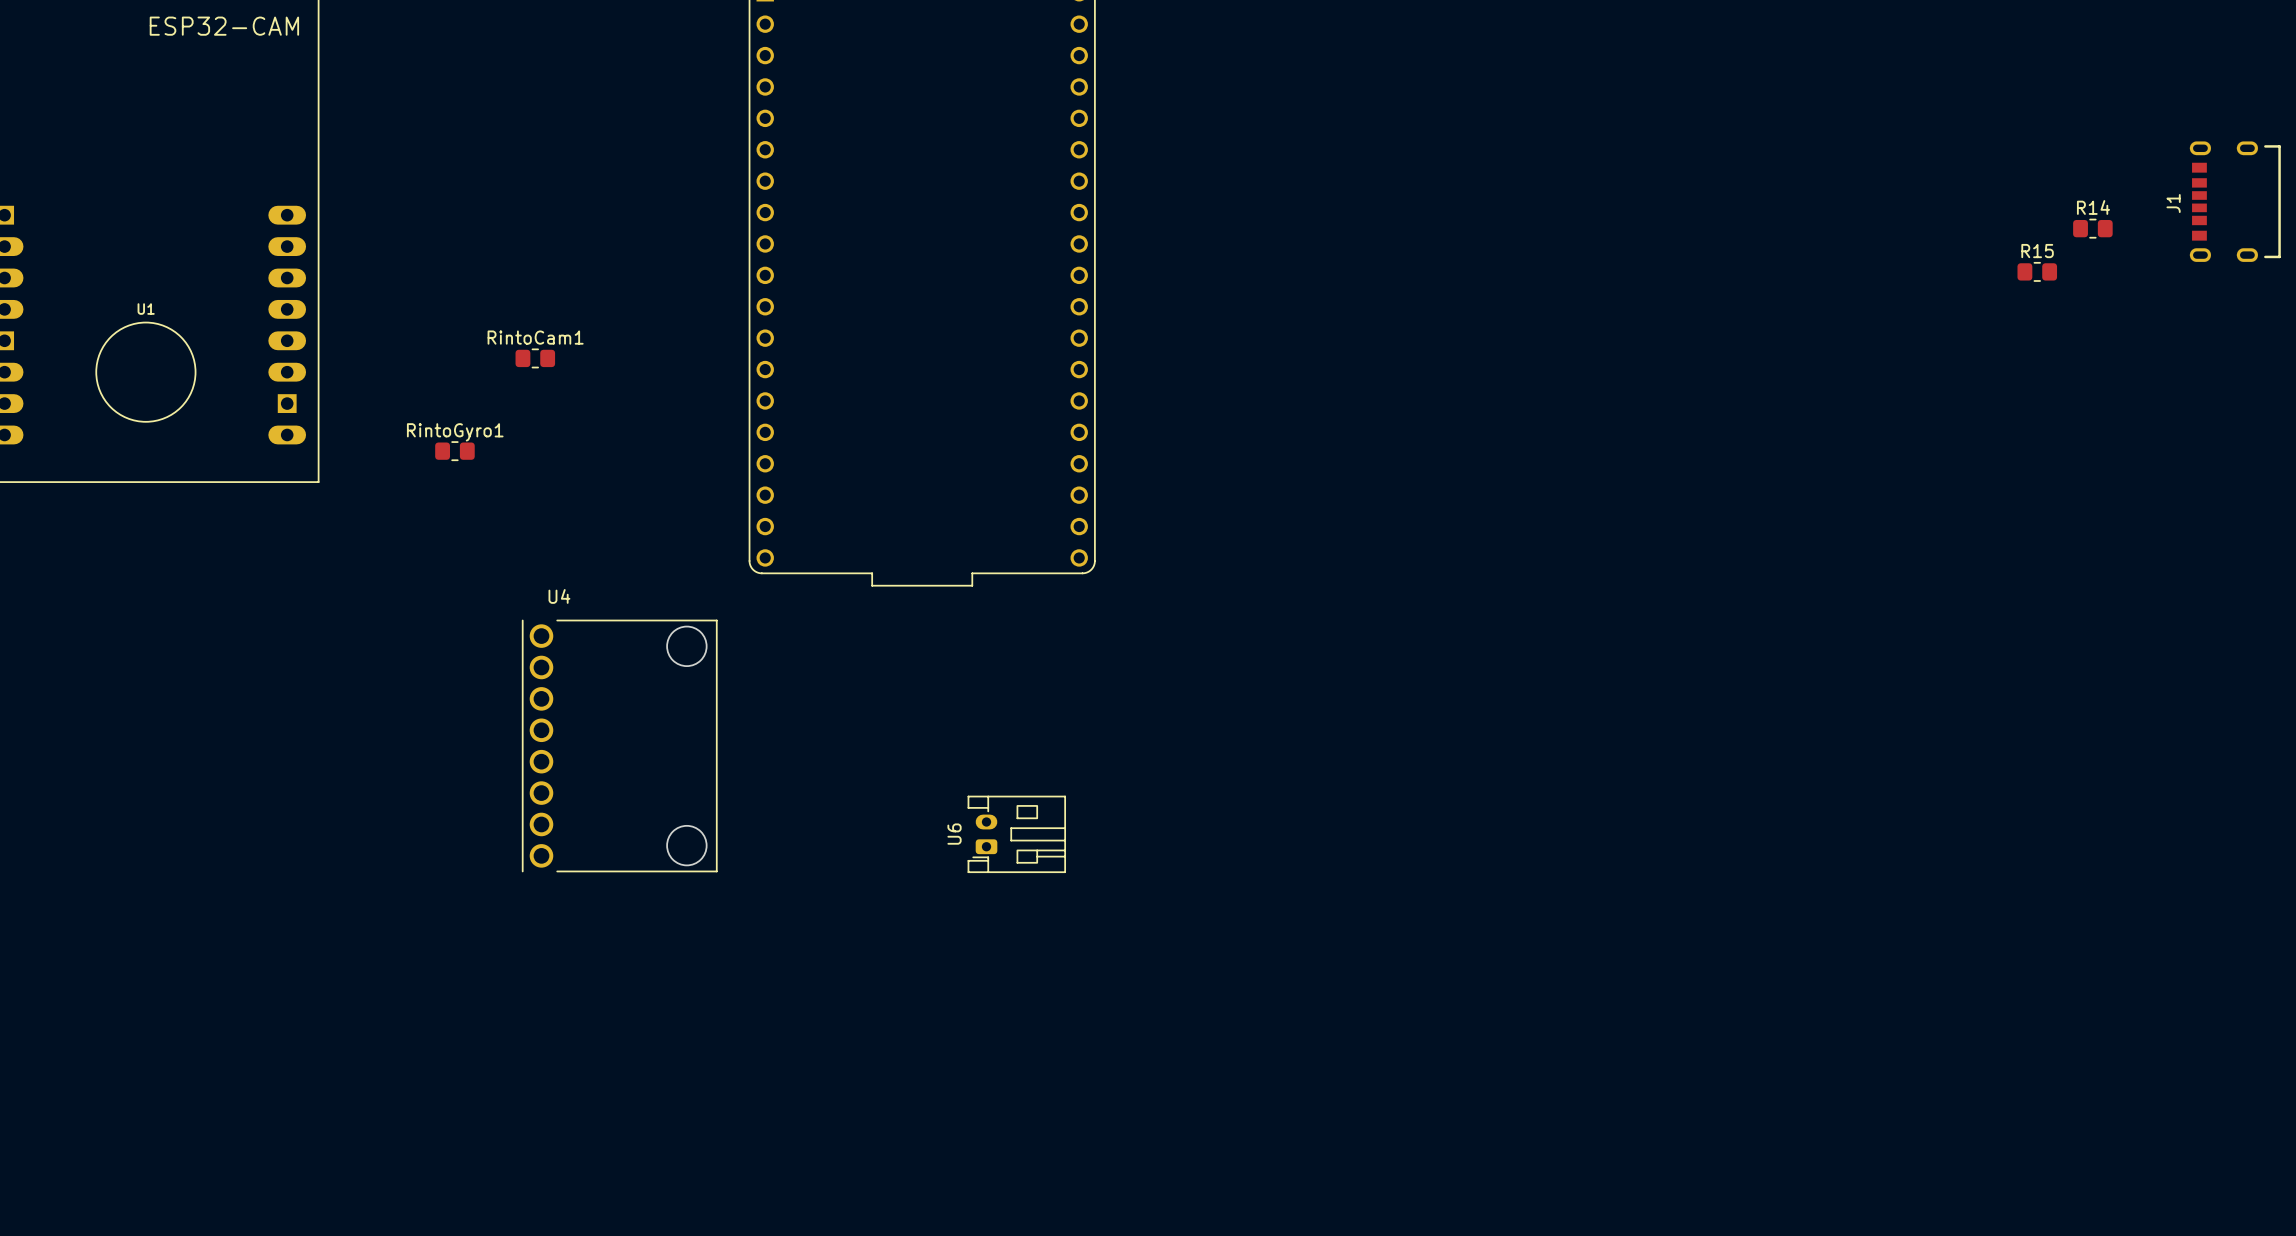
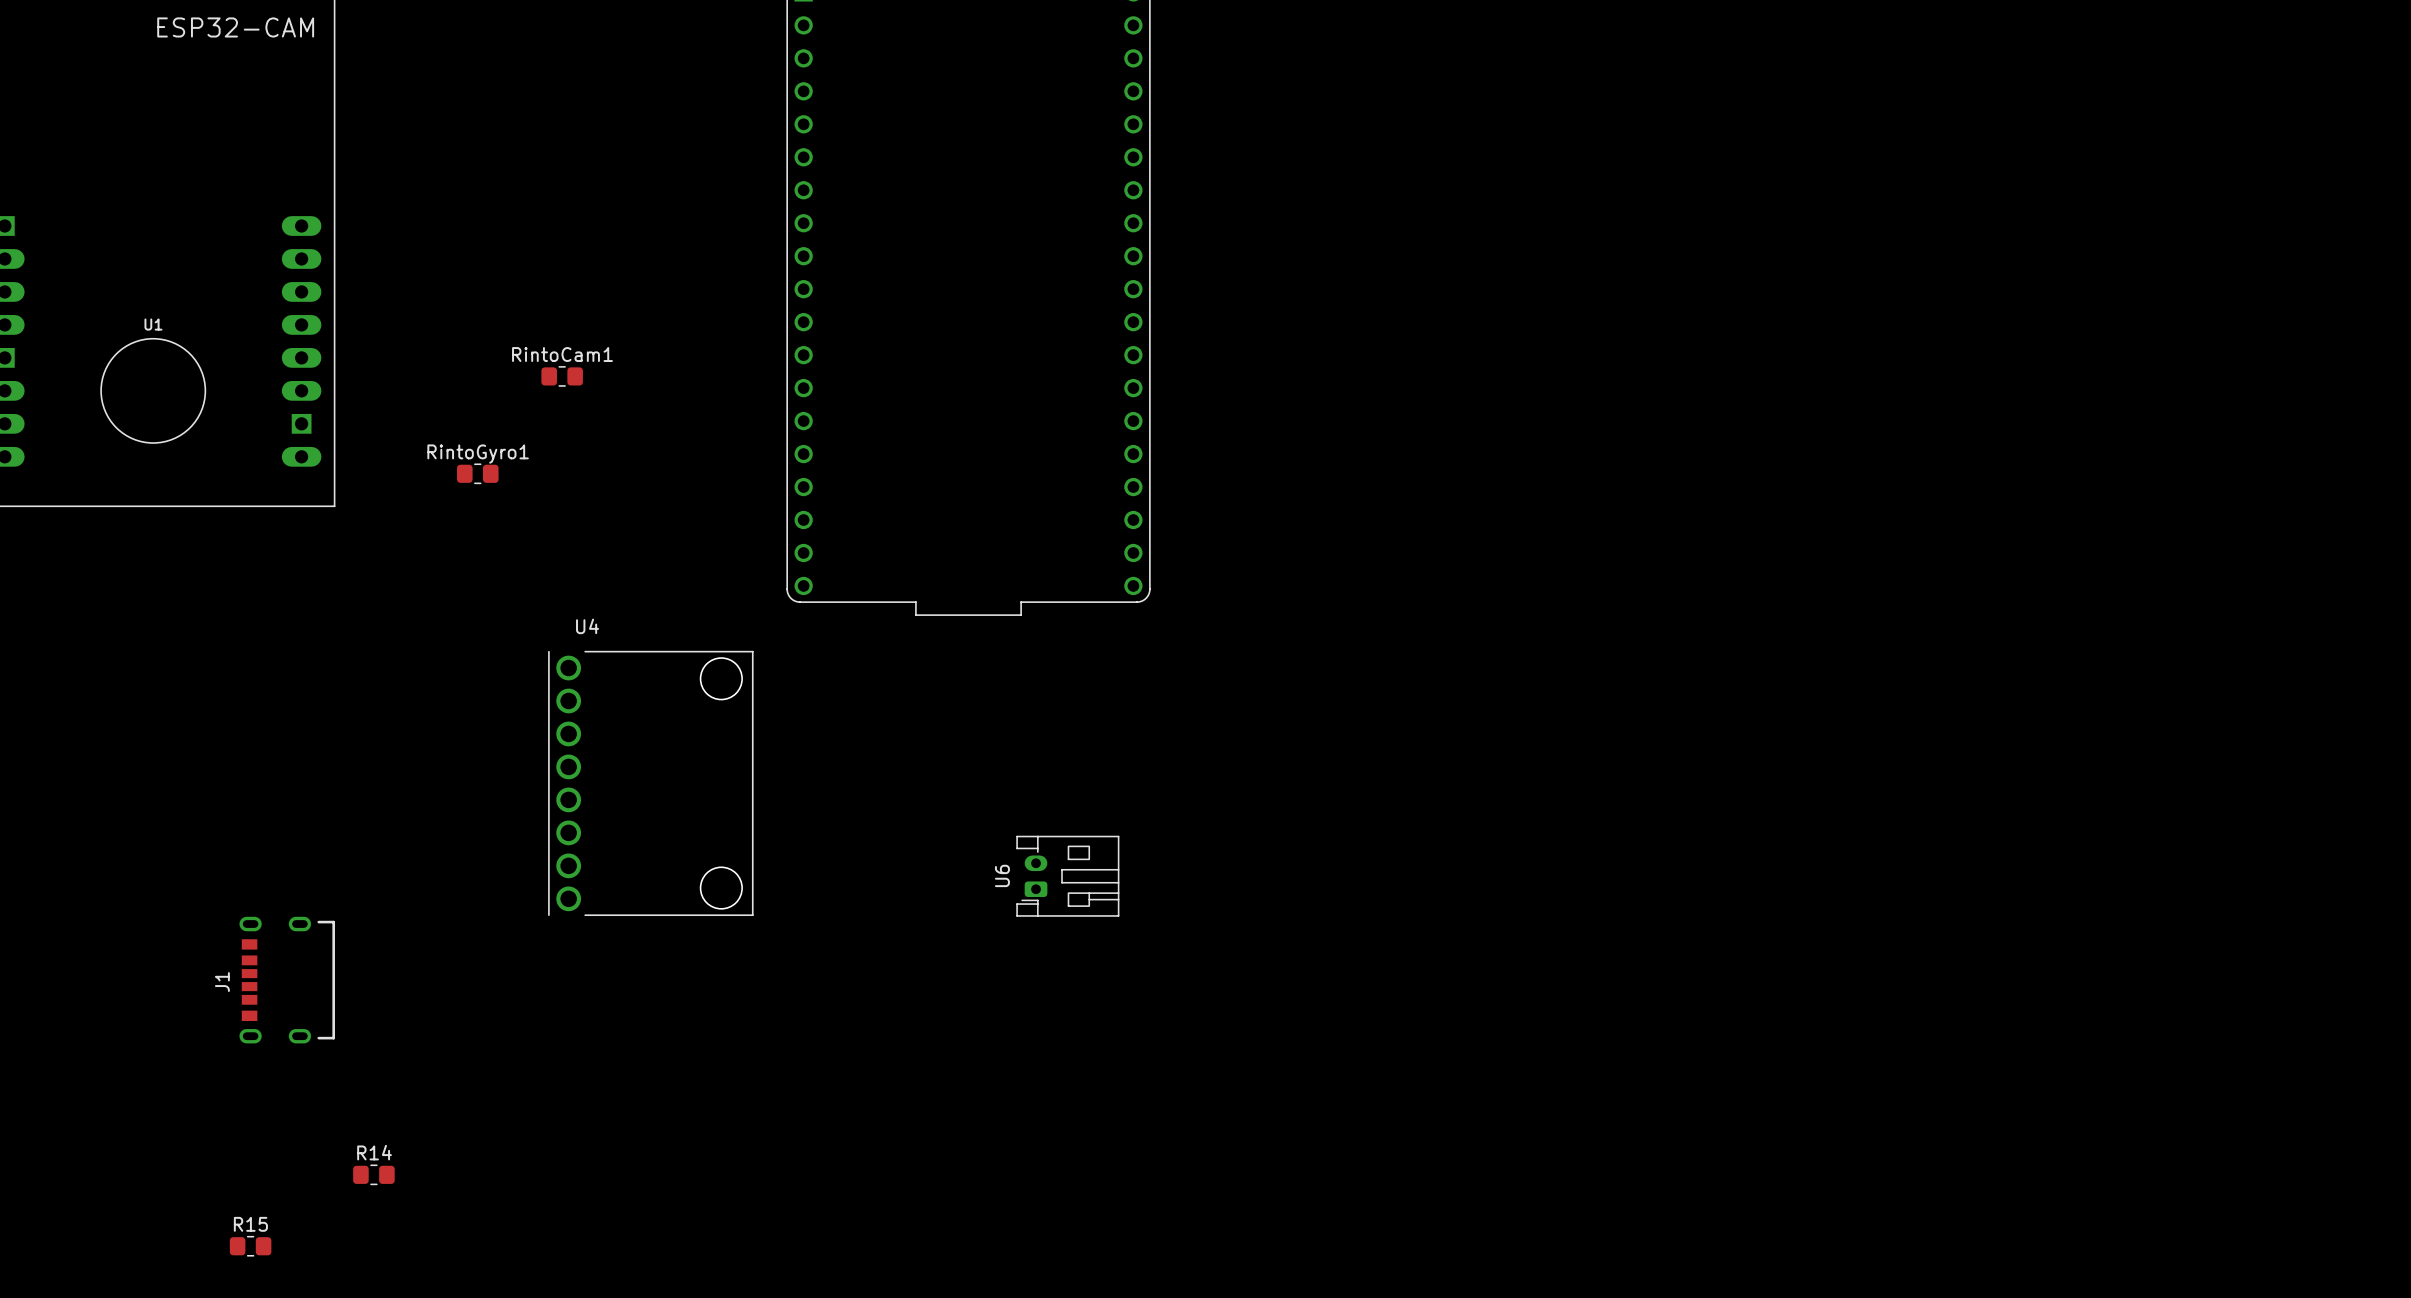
J1 position: (2235, 201) -> (287, 980)
R14 position: (2092, 228) -> (373, 1174)
R15 position: (2037, 271) -> (250, 1246)

